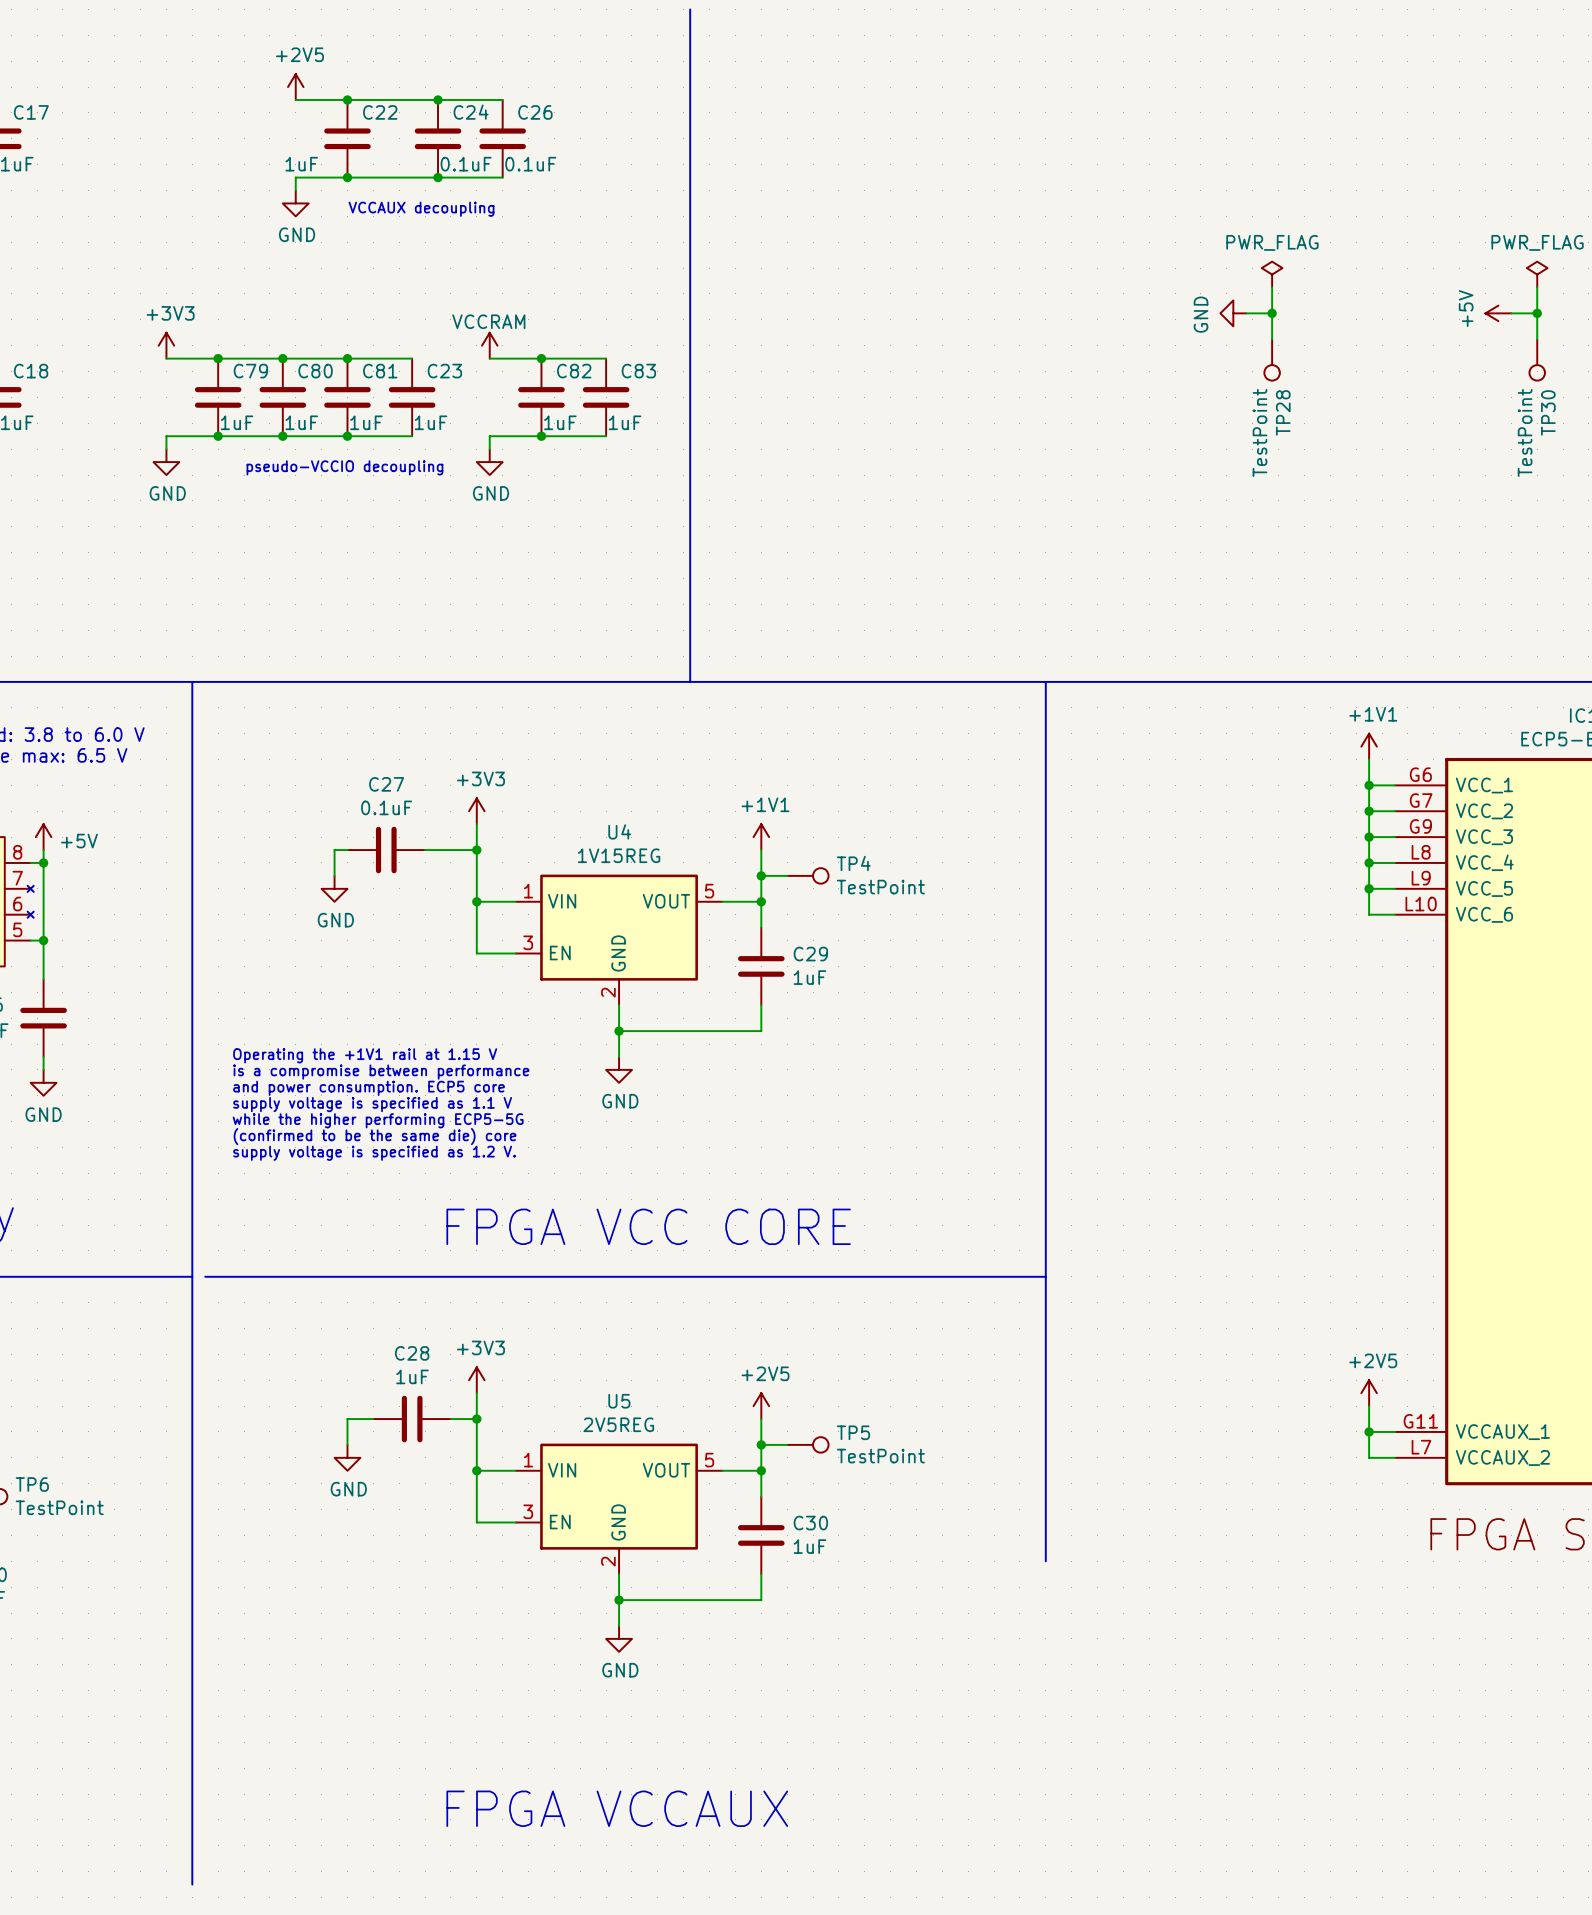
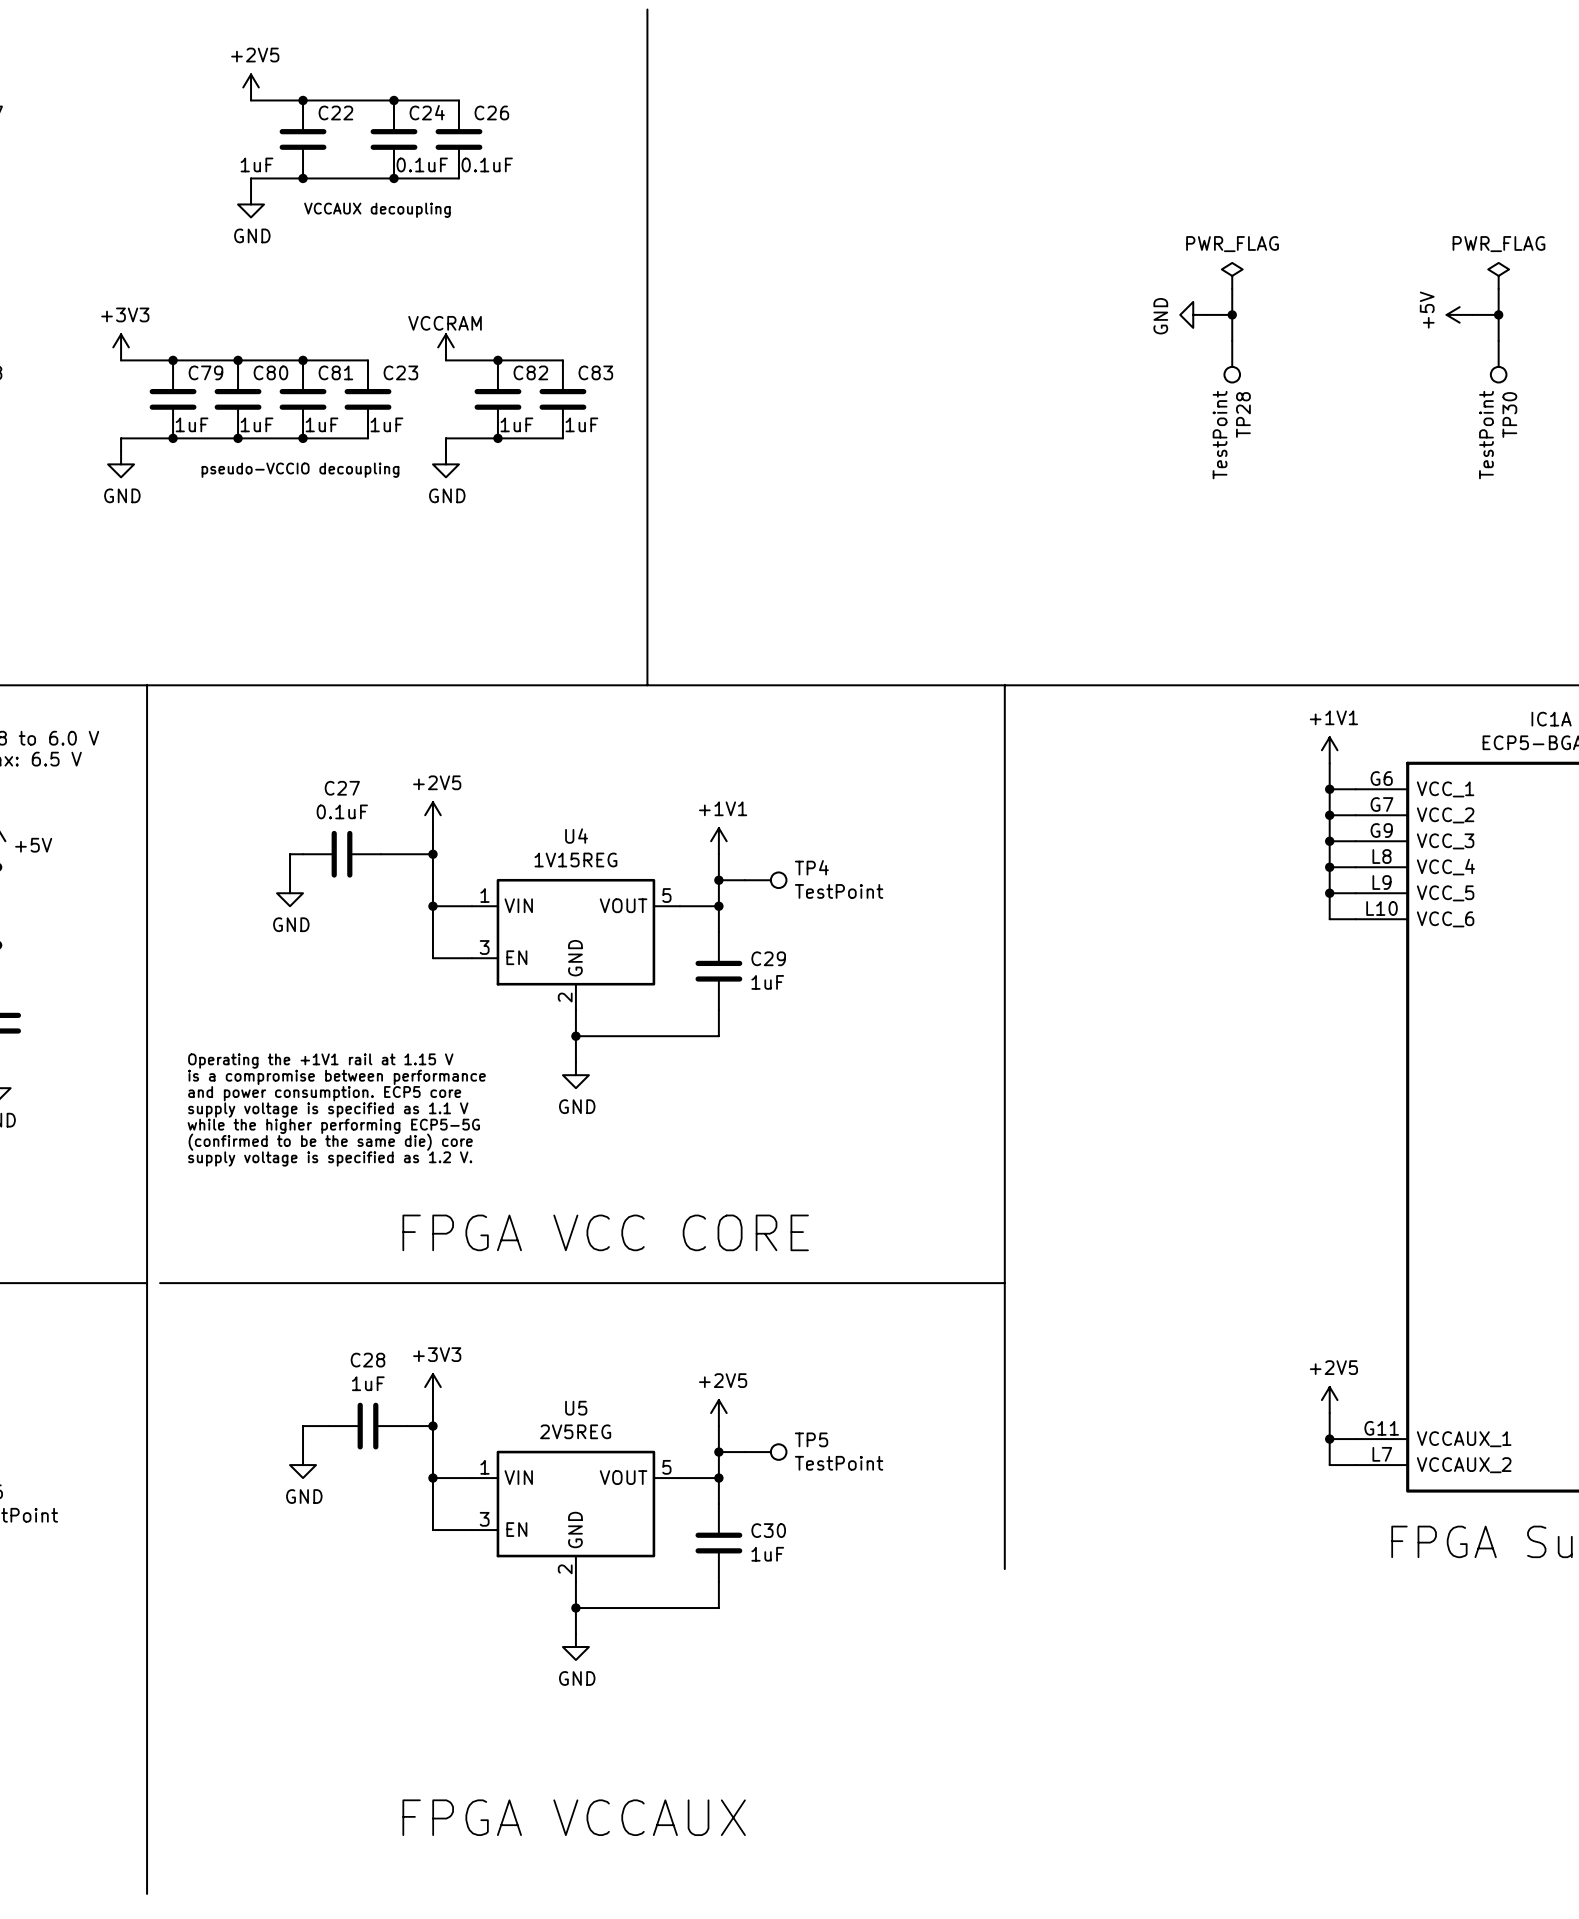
power symbol: +3V3 (476, 811) -> +2V5 (432, 815)

